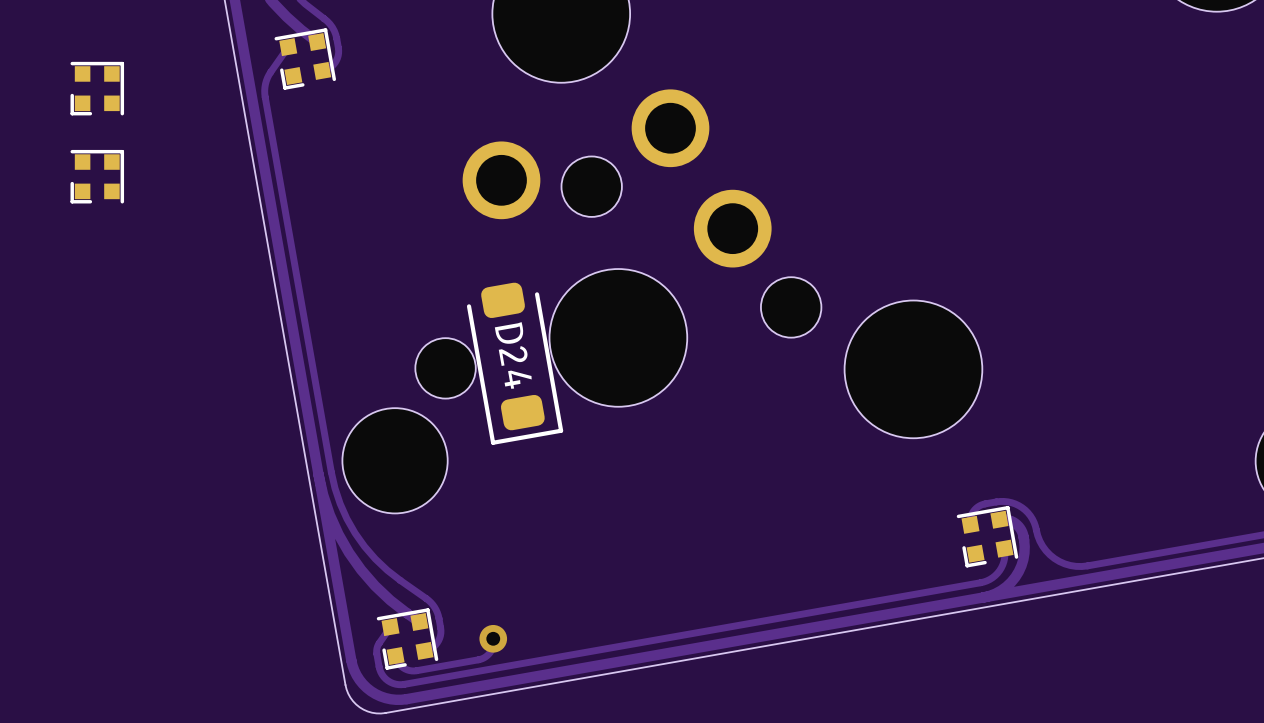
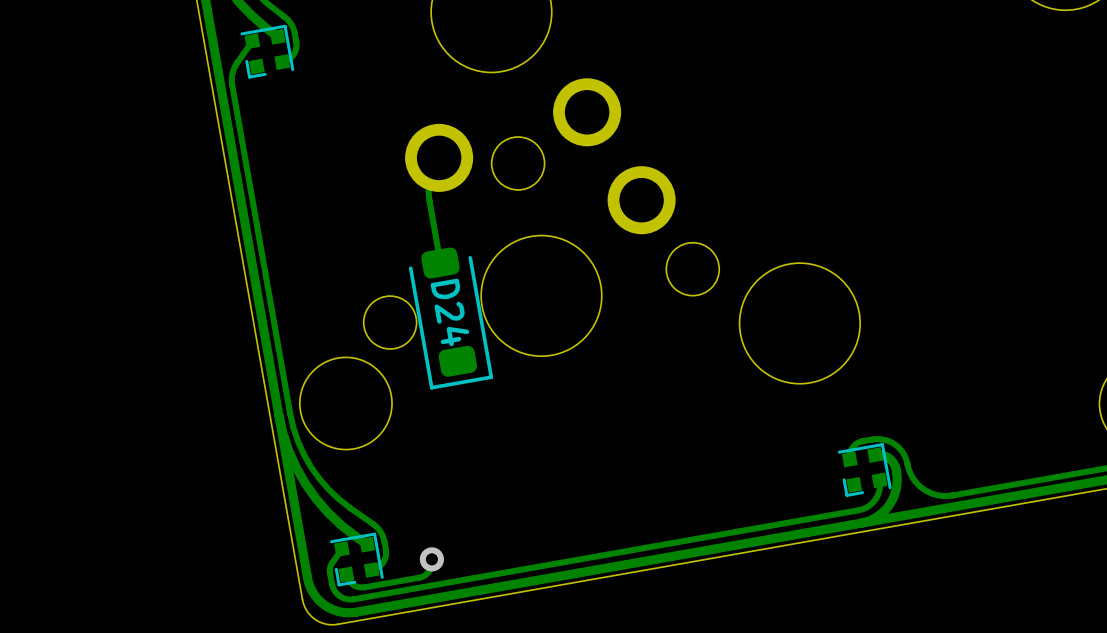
part: (97, 88) -> none
part: (97, 176) -> none
track: none -> (439, 157) (431, 173) (428, 189) (440, 263)

